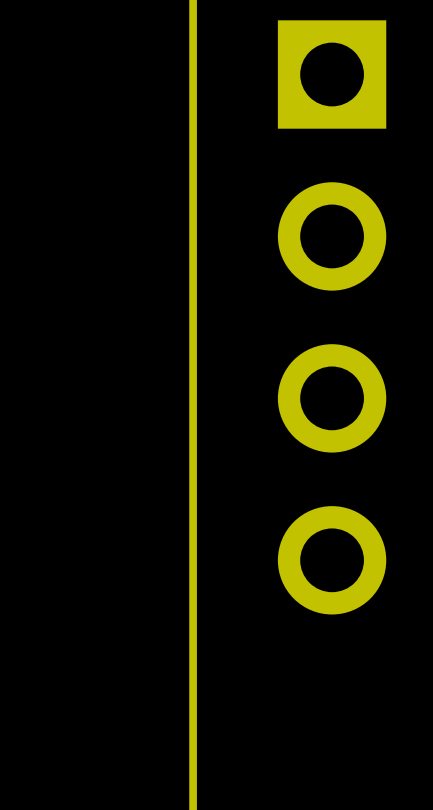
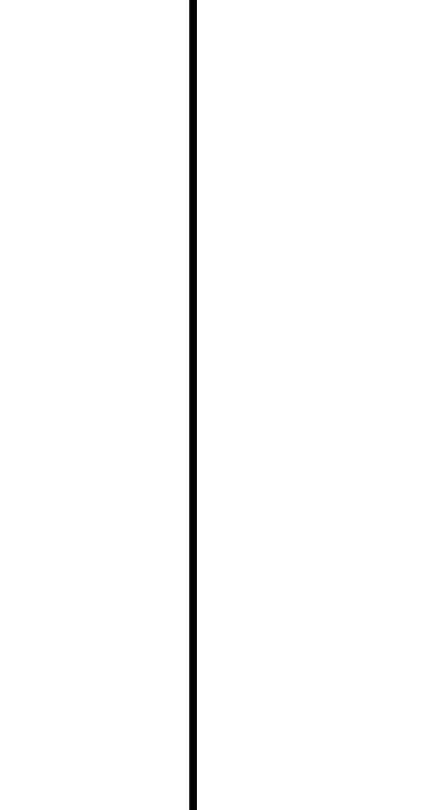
part: (332, 317) -> none

